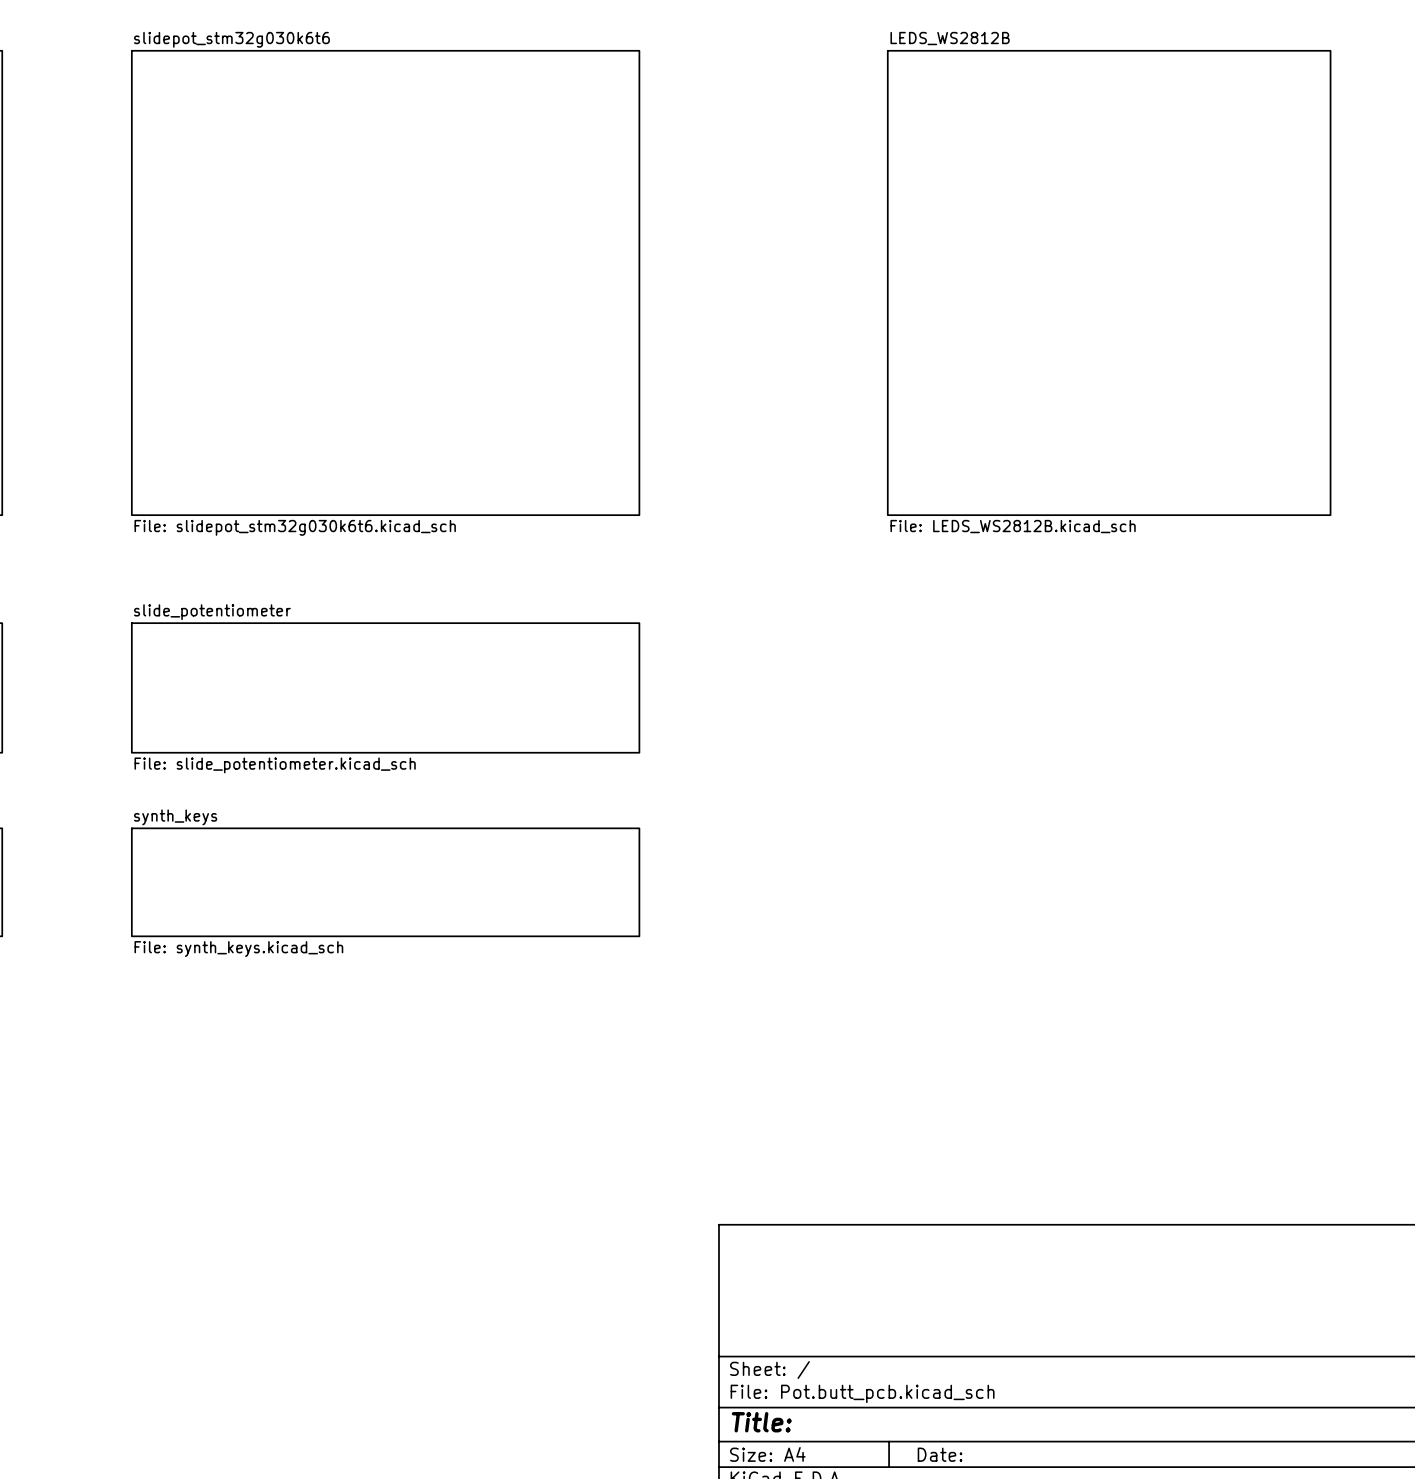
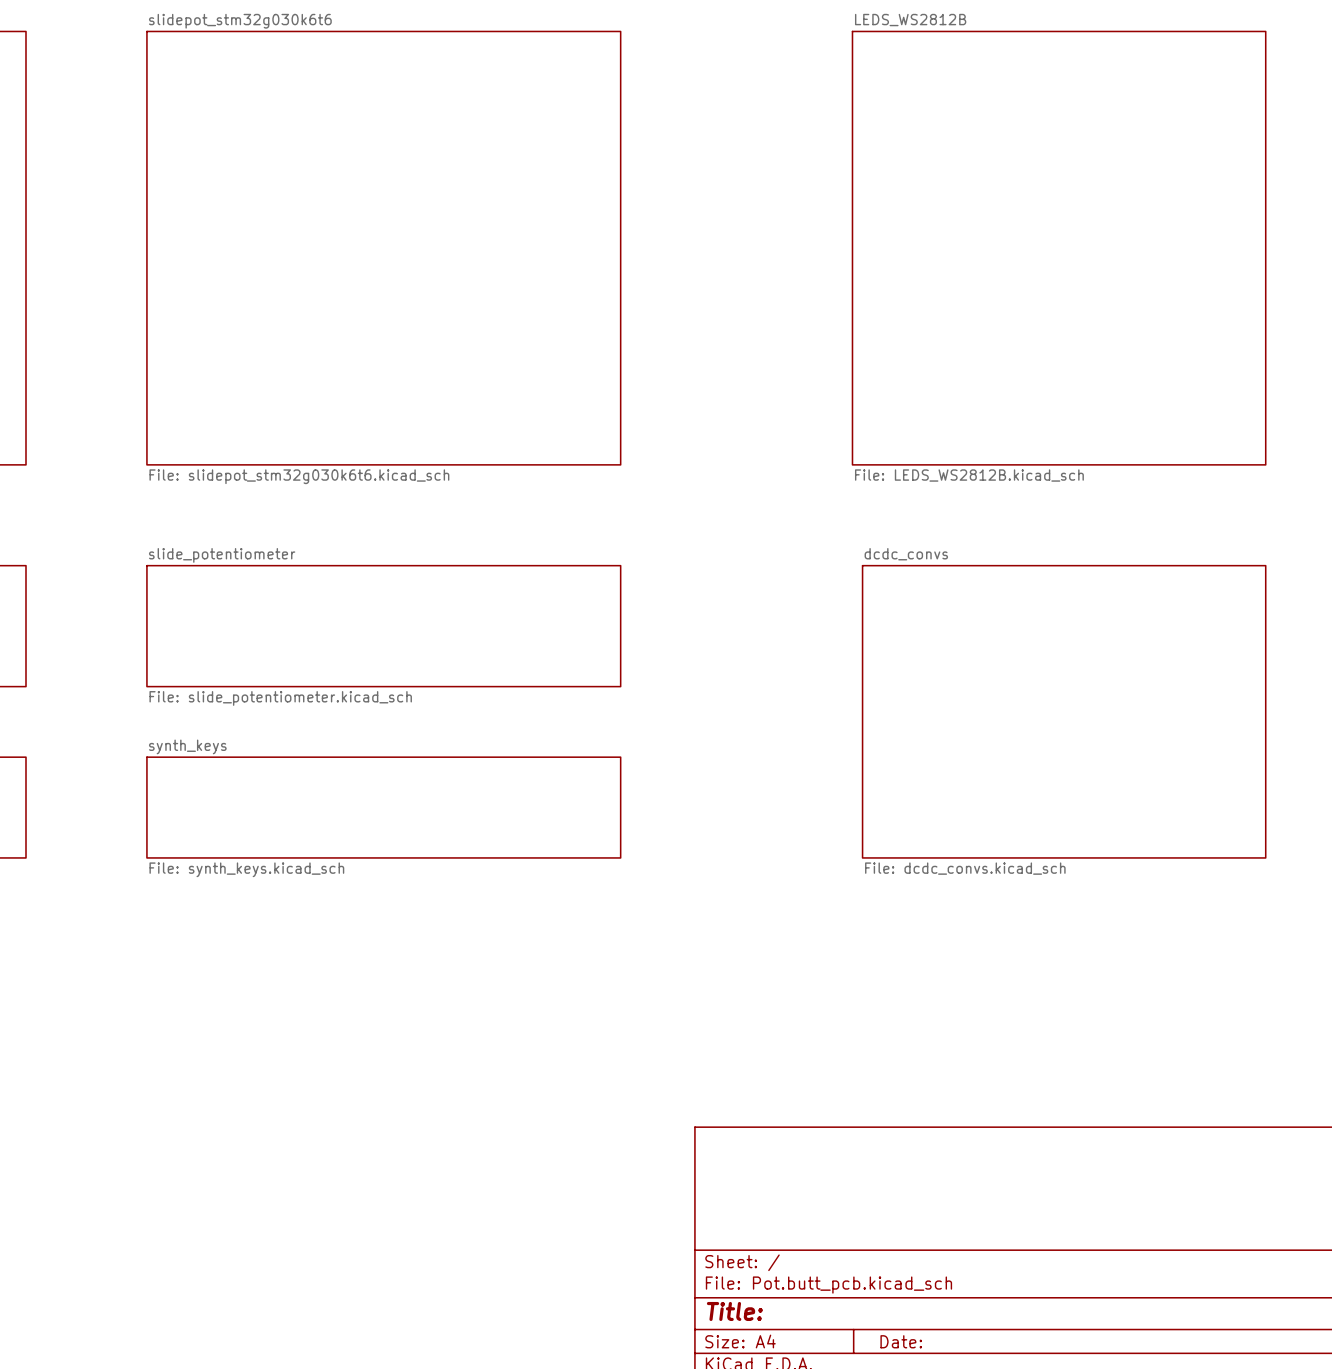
sheet dcdc_convs: none -> File: dcdc_convs.kicad_sch (1064, 711)

